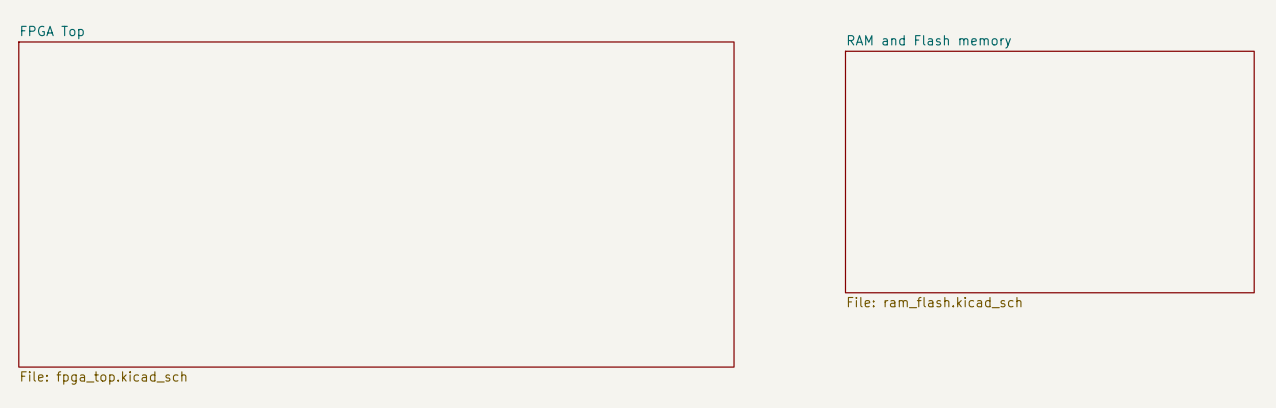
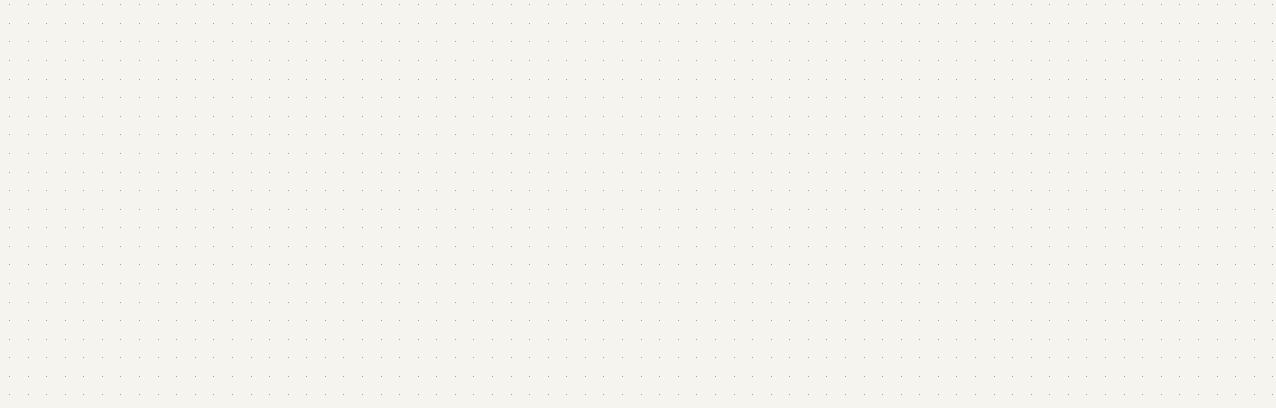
sheet RAM and Flash memory: File: ram_flash.kicad_sch (1049, 172) -> none
sheet FPGA Top: File: fpga_top.kicad_sch (376, 204) -> none

